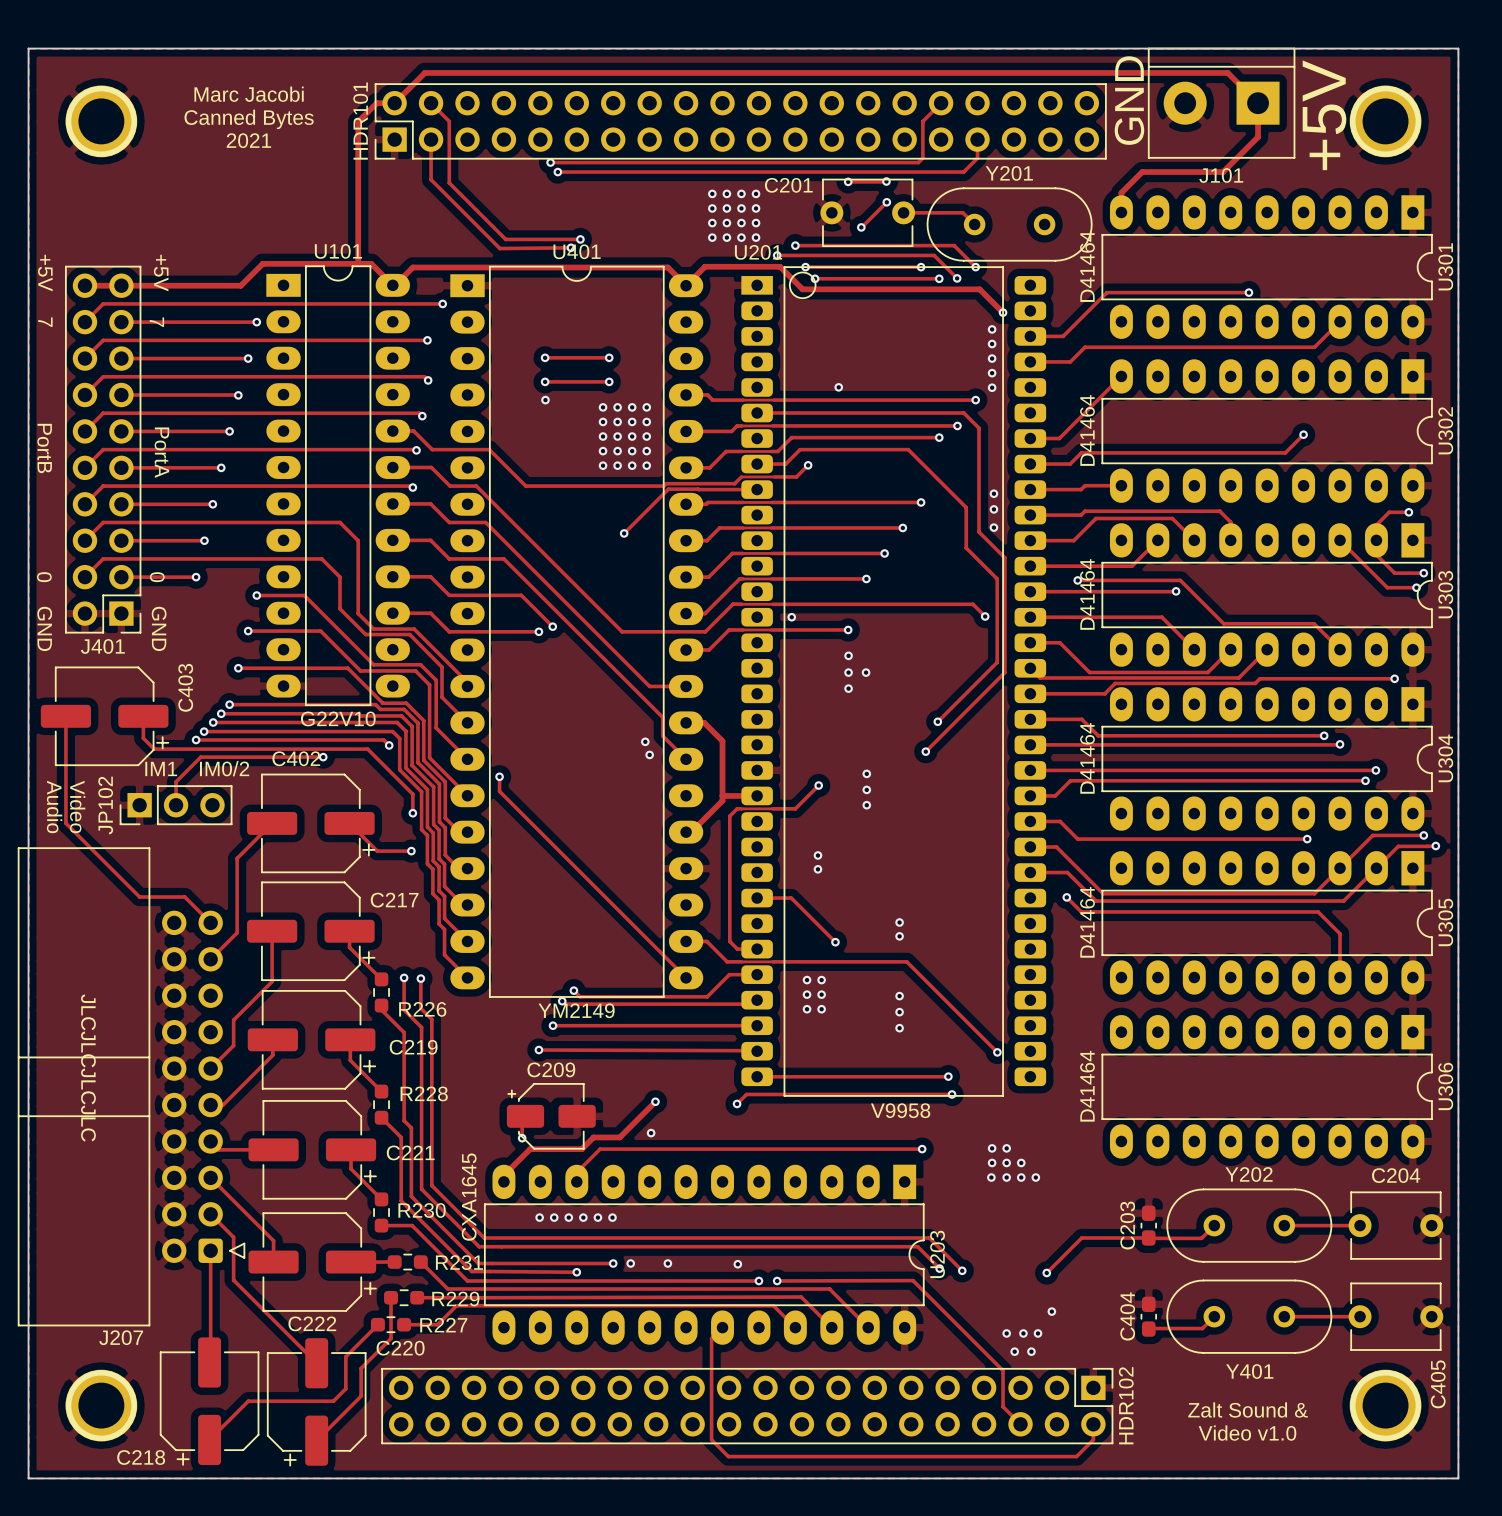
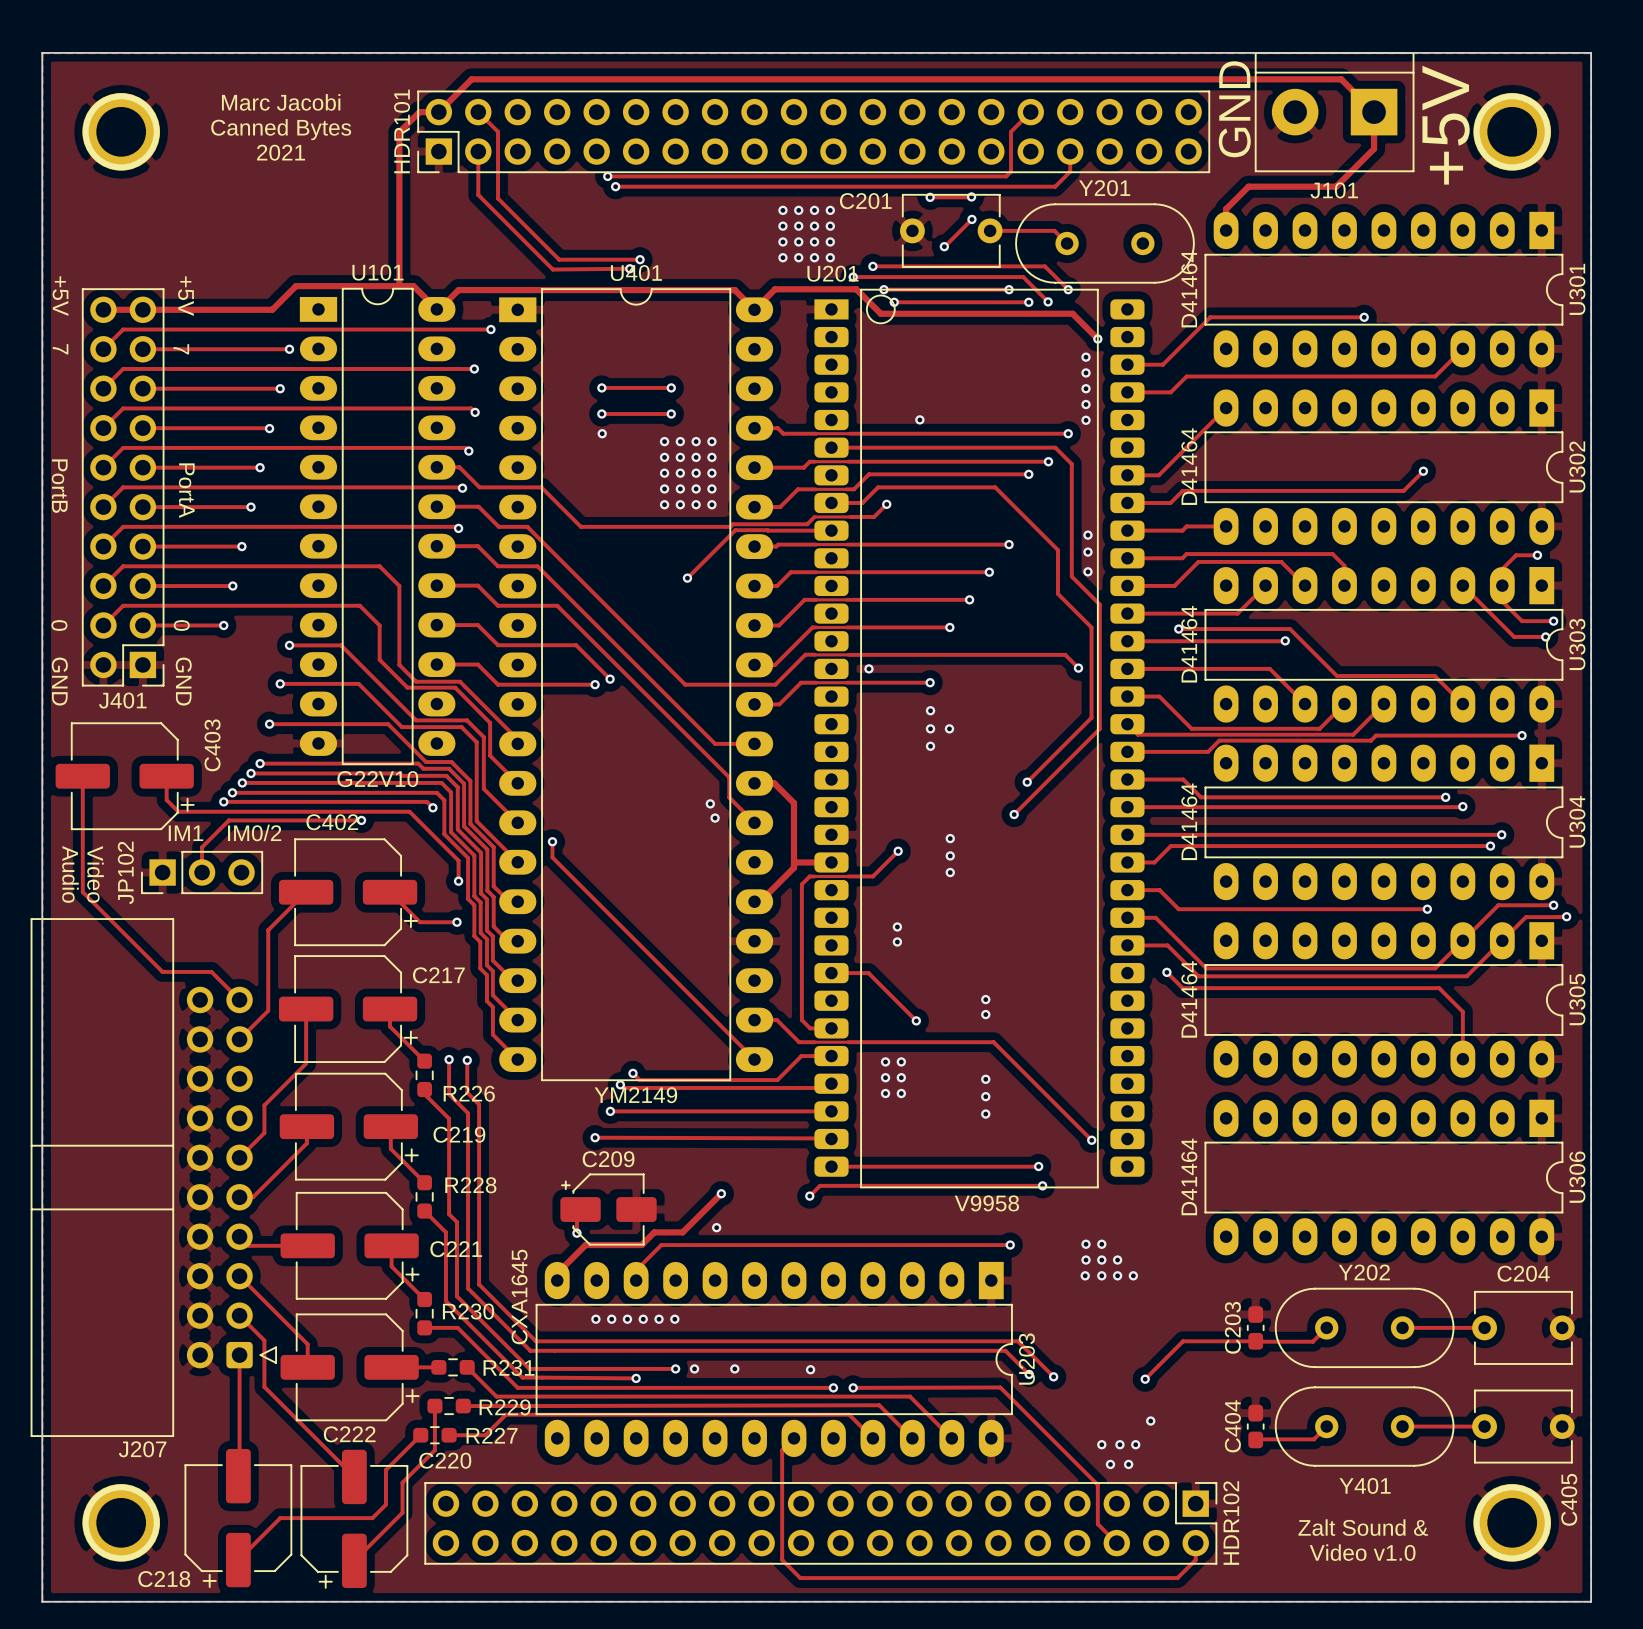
text: JLCJLCJLCJLC (88, 1068) -> none

